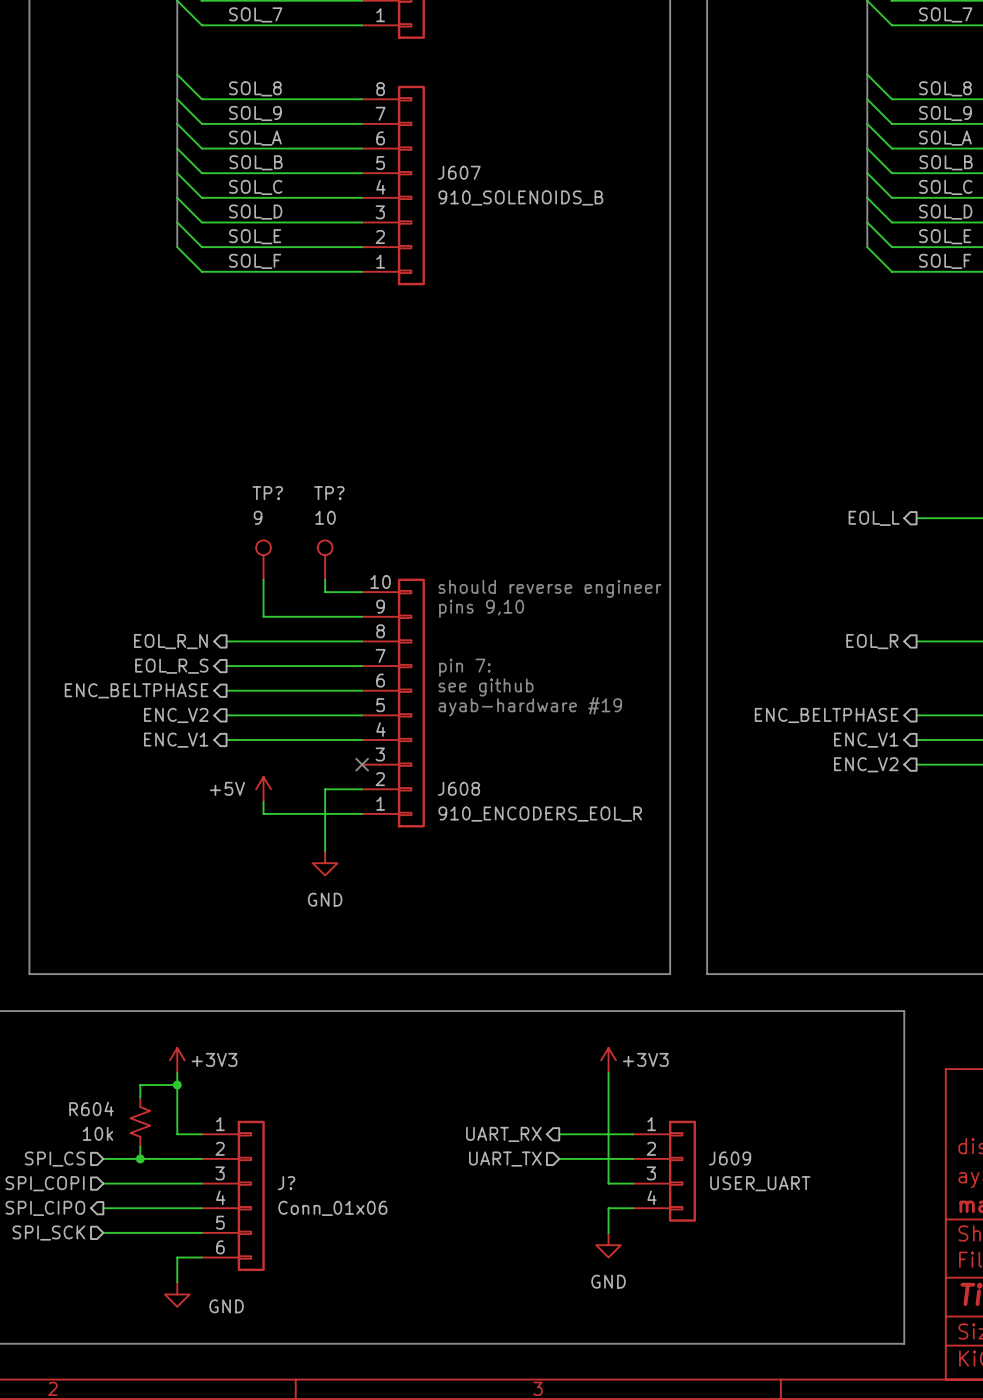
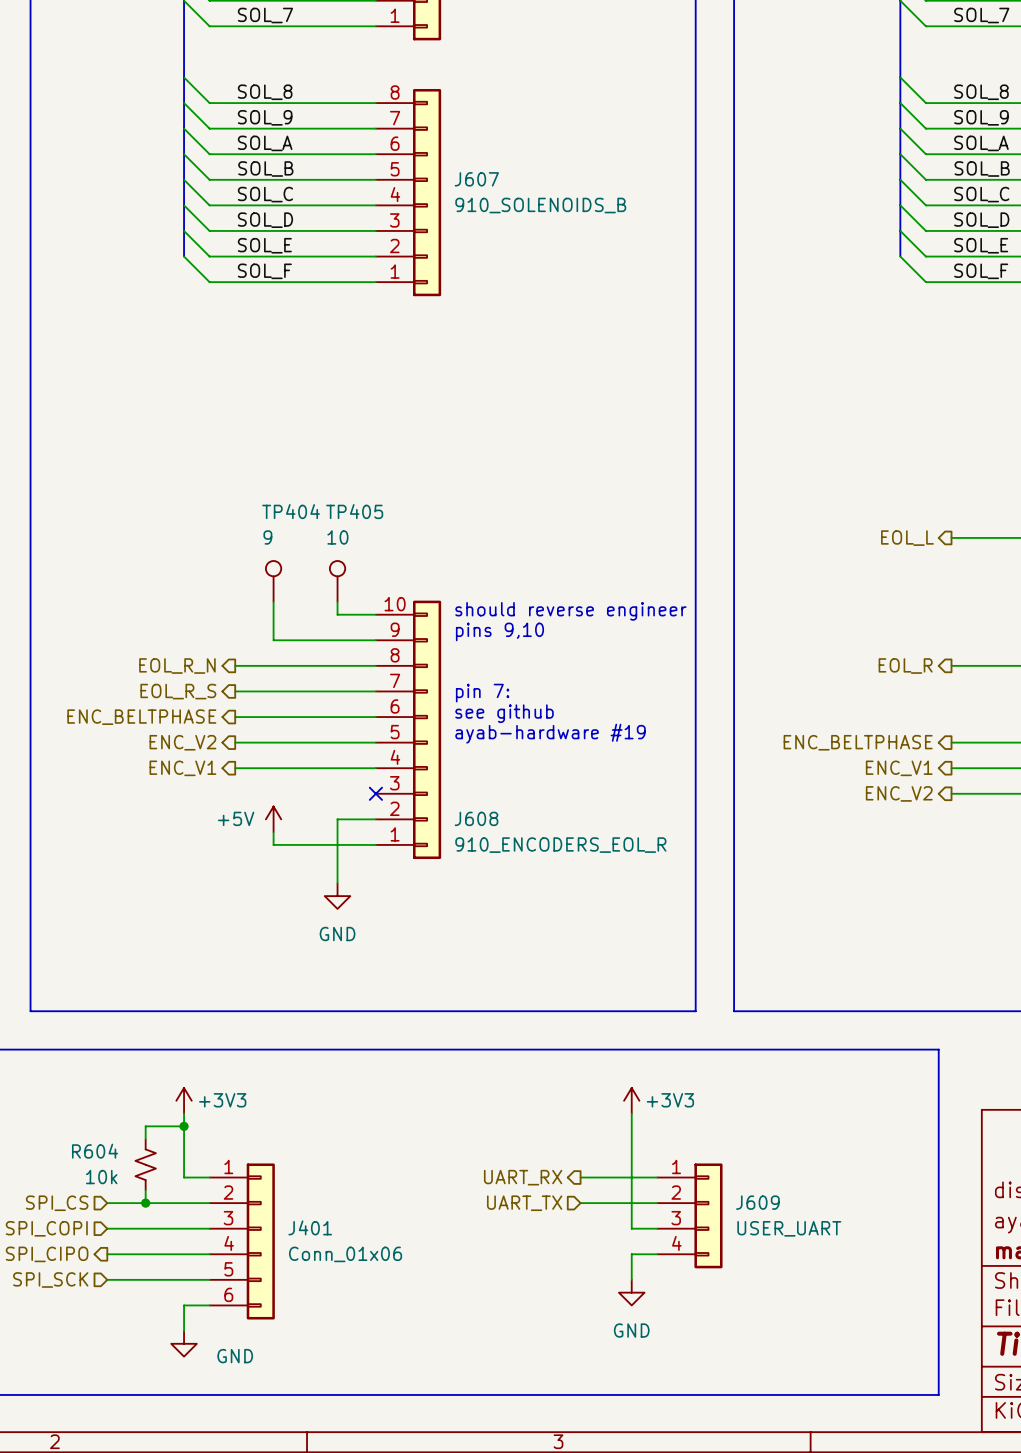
TP? name: TP? (267, 493) -> TP404 (291, 511)
TP? name: TP? (329, 493) -> TP405 (354, 511)
J? name: J? (286, 1183) -> J401 (310, 1227)

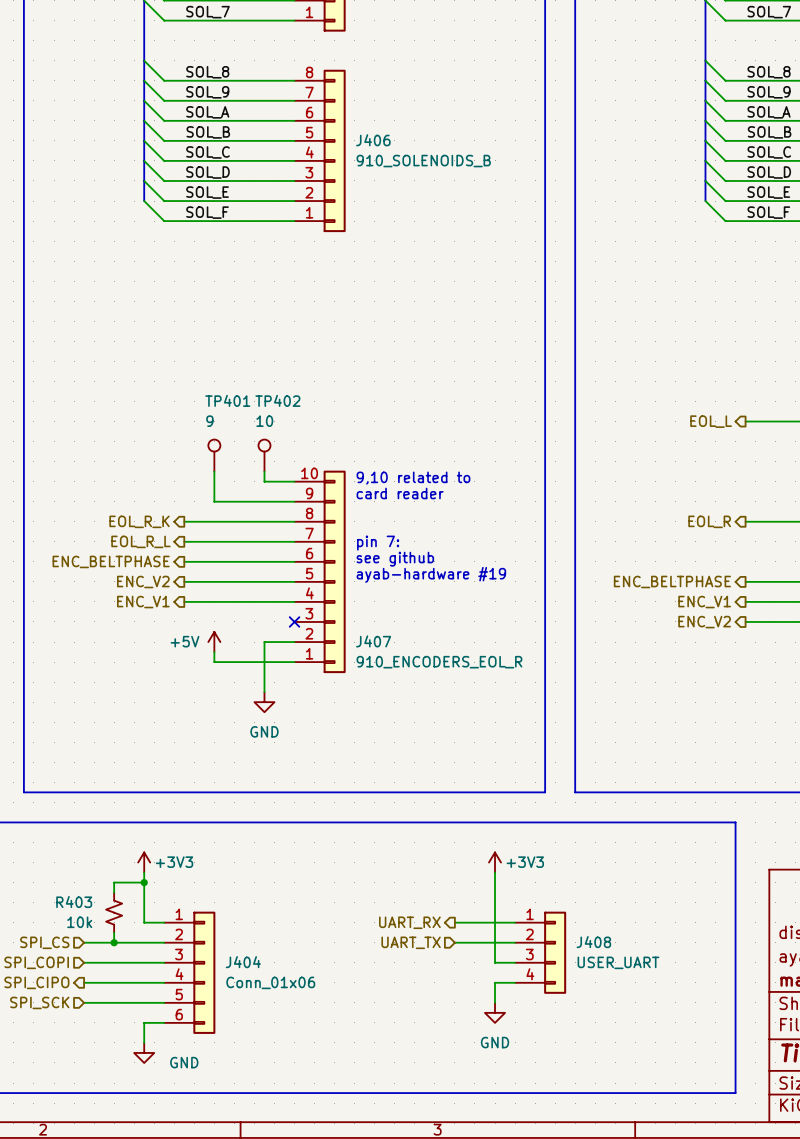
J607 name: J607 (476, 179) -> J406 (373, 140)
TP404 name: TP404 (291, 511) -> TP401 (227, 400)
TP405 name: TP405 (354, 511) -> TP402 (277, 400)
text: should reverse engineer (570, 611) -> 9,10 related to (413, 478)
text: pins 9,10 (499, 631) -> card reader (400, 493)
hierarchical label: EOL_R_N (177, 666) -> EOL_R_K (139, 521)
hierarchical label: EOL_R_S (178, 691) -> EOL_R_L (140, 541)
J608 name: J608 (476, 818) -> J407 (373, 641)
R604 name: R604 (95, 1151) -> R403 (74, 902)
J609 name: J609 (757, 1202) -> J408 (593, 942)
J401 name: J401 (310, 1227) -> J404 (243, 962)

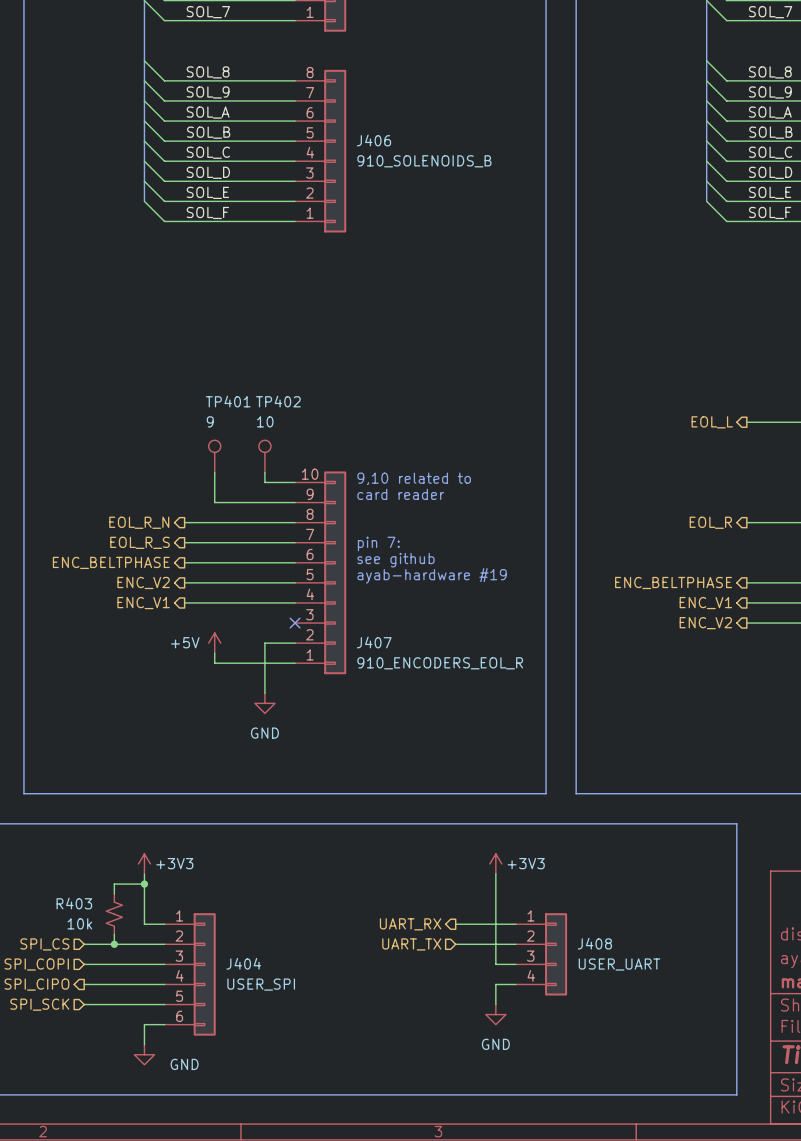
hierarchical label: EOL_R_K (139, 521) -> EOL_R_N (139, 522)
hierarchical label: EOL_R_L (140, 541) -> EOL_R_S (139, 542)
J404 value: Conn_01x06 (270, 982) -> USER_SPI (261, 984)

